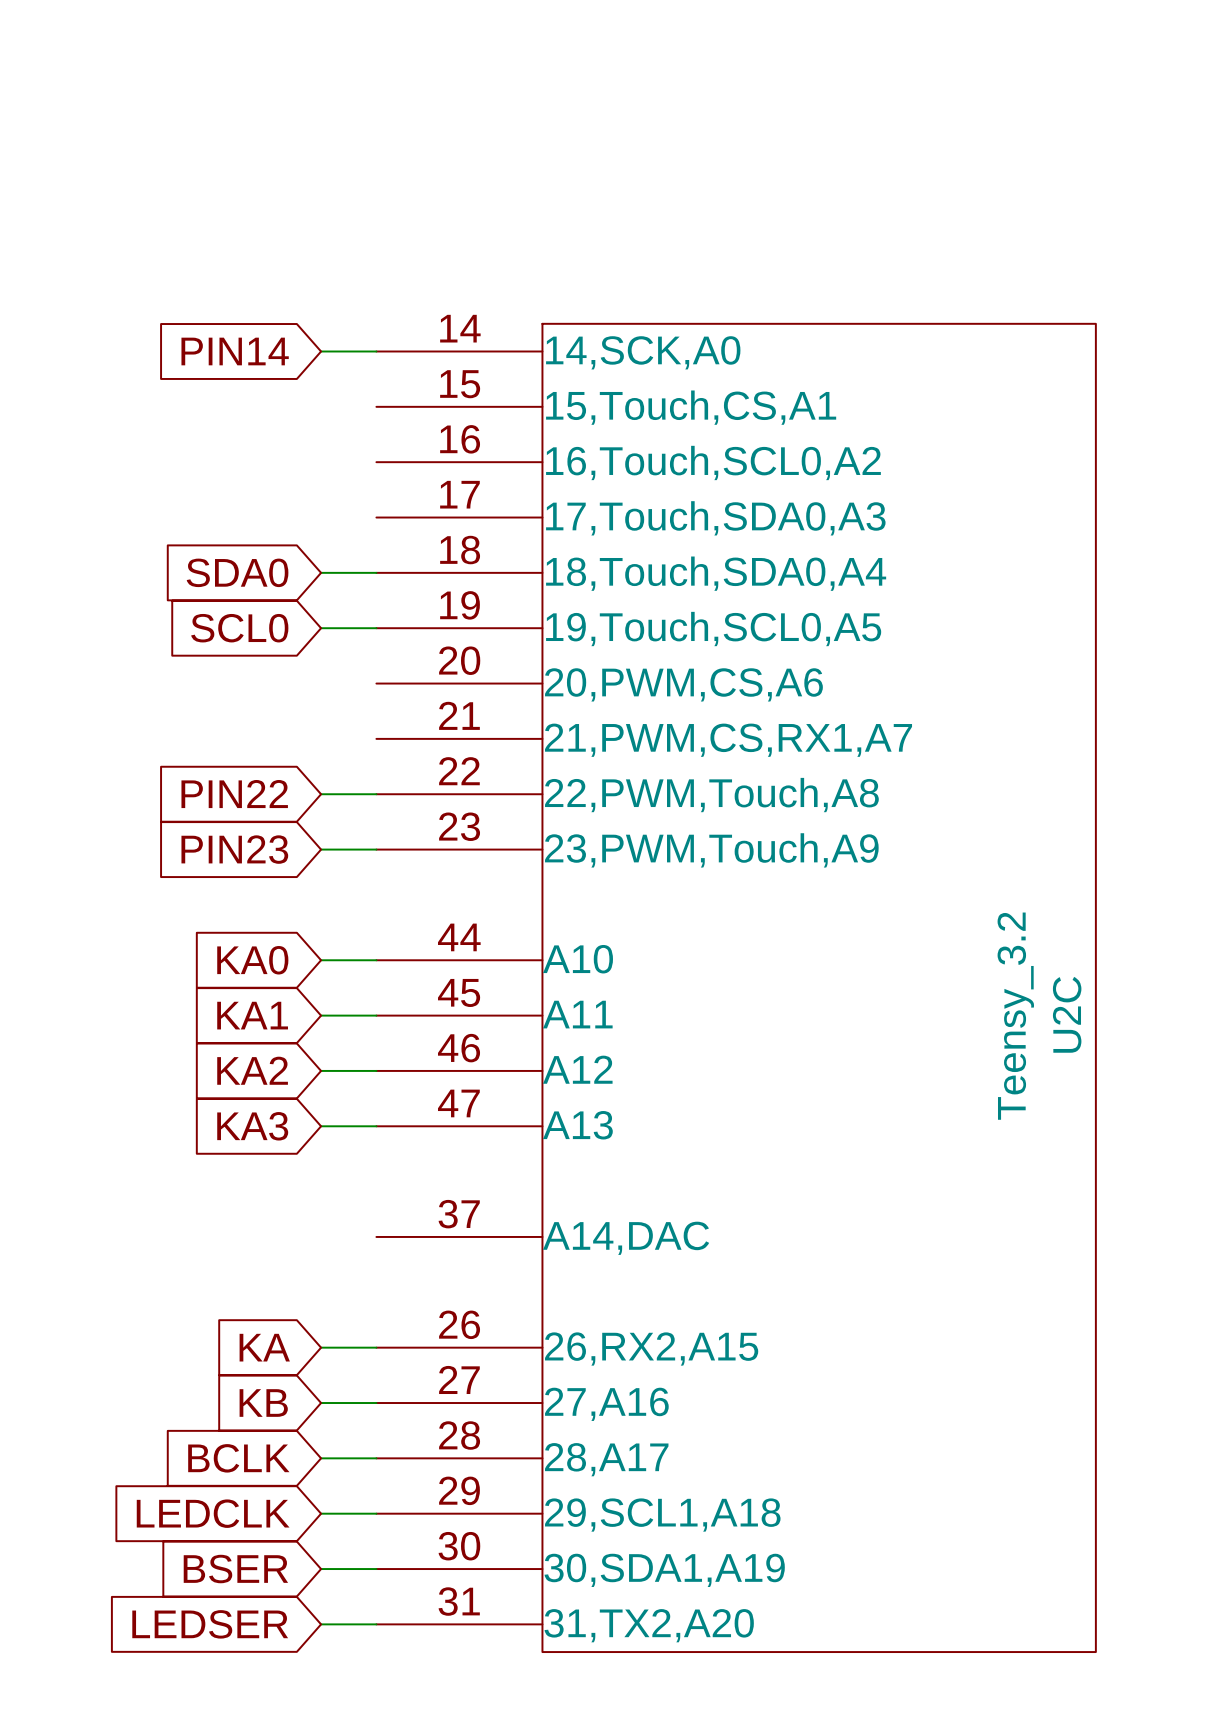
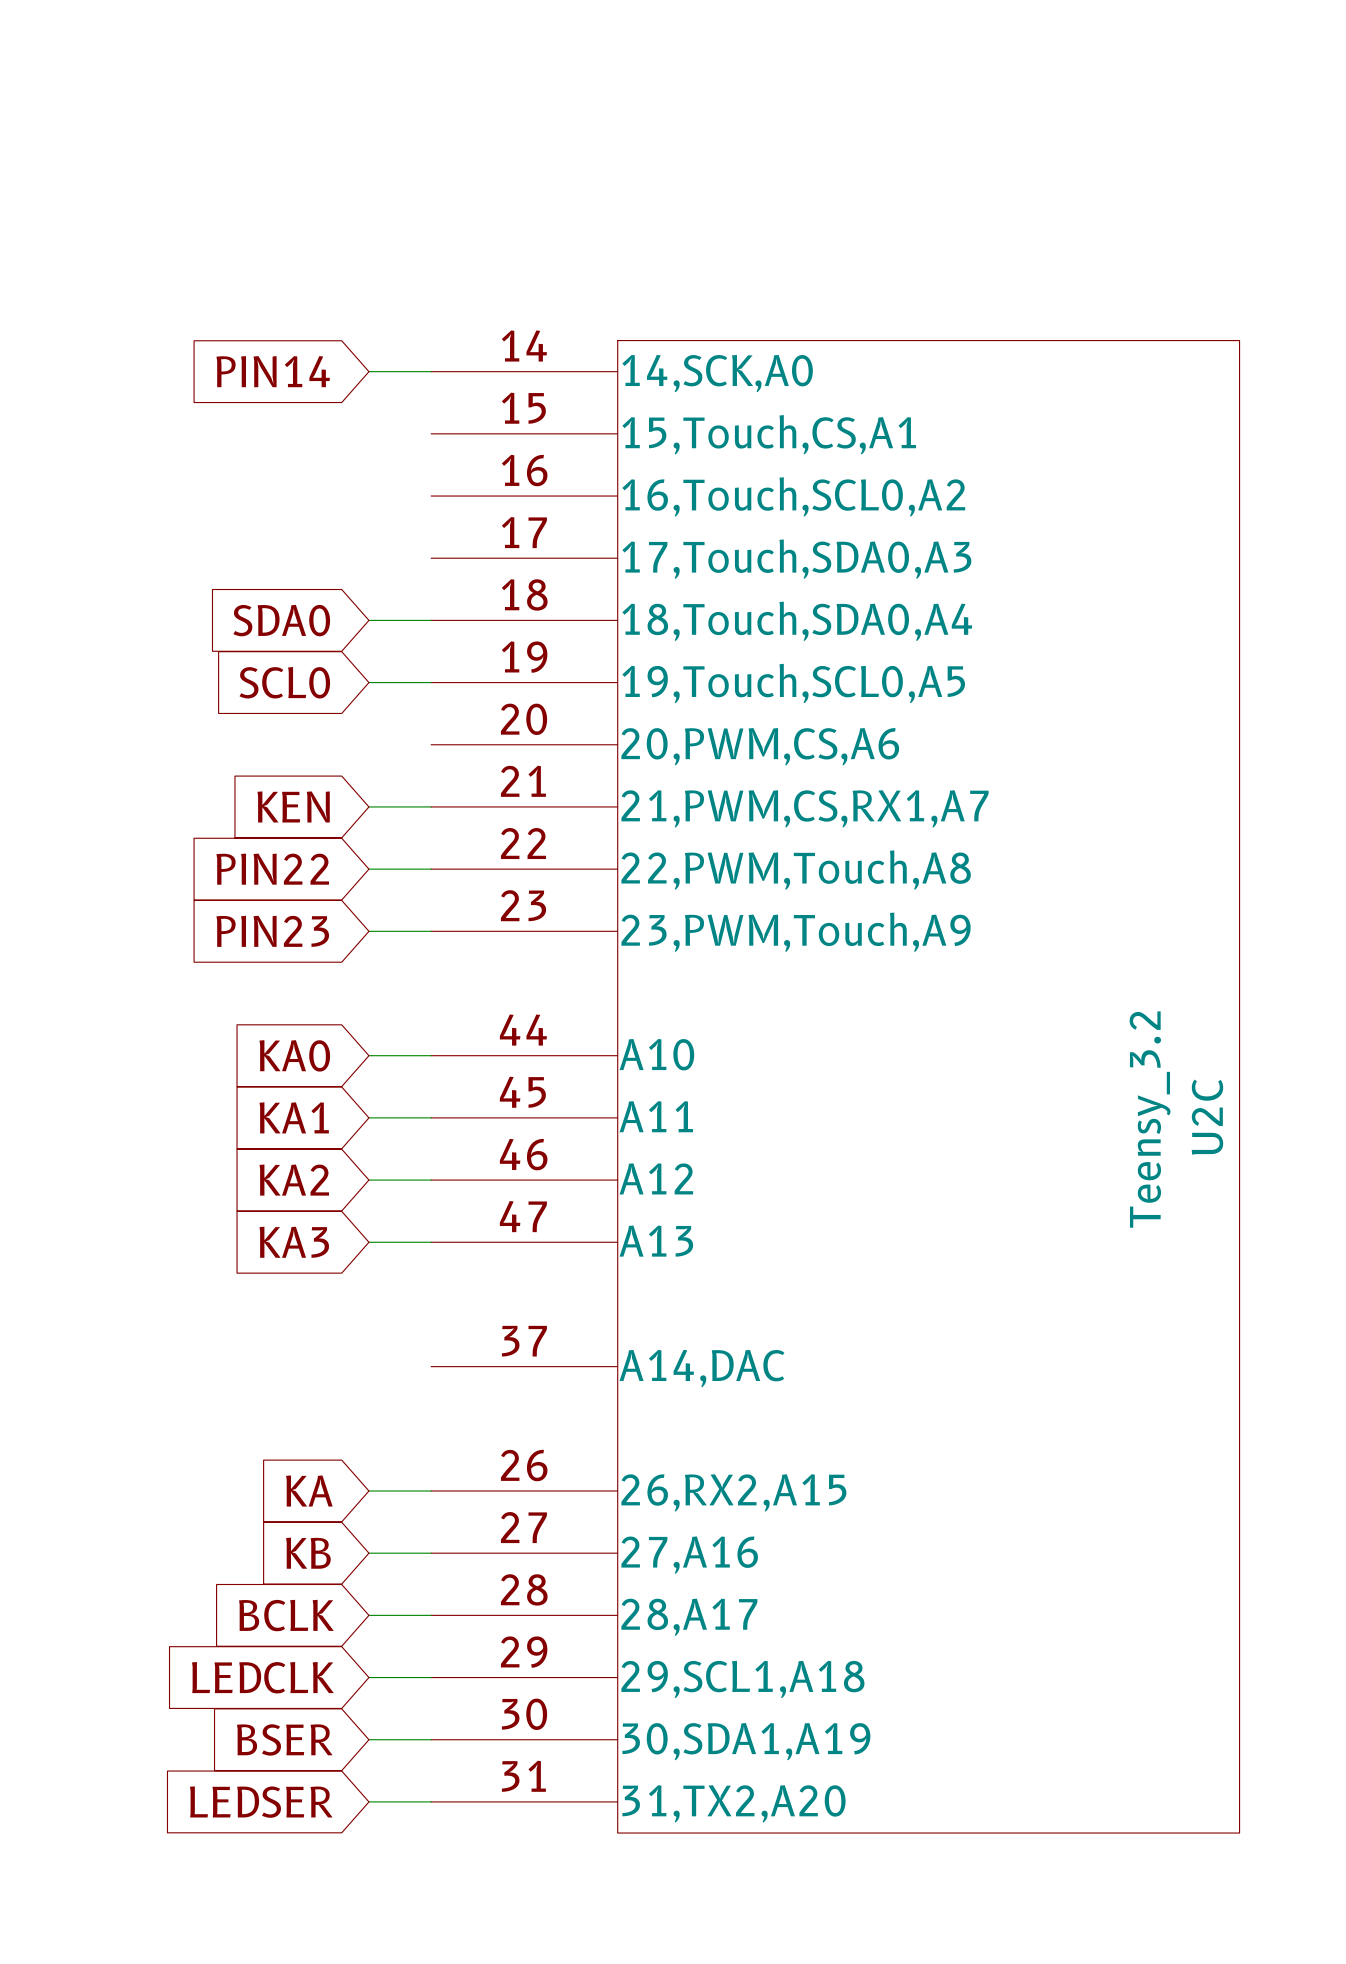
global label: none -> KEN (293, 806)
wire: none -> (368, 806) (431, 806)

